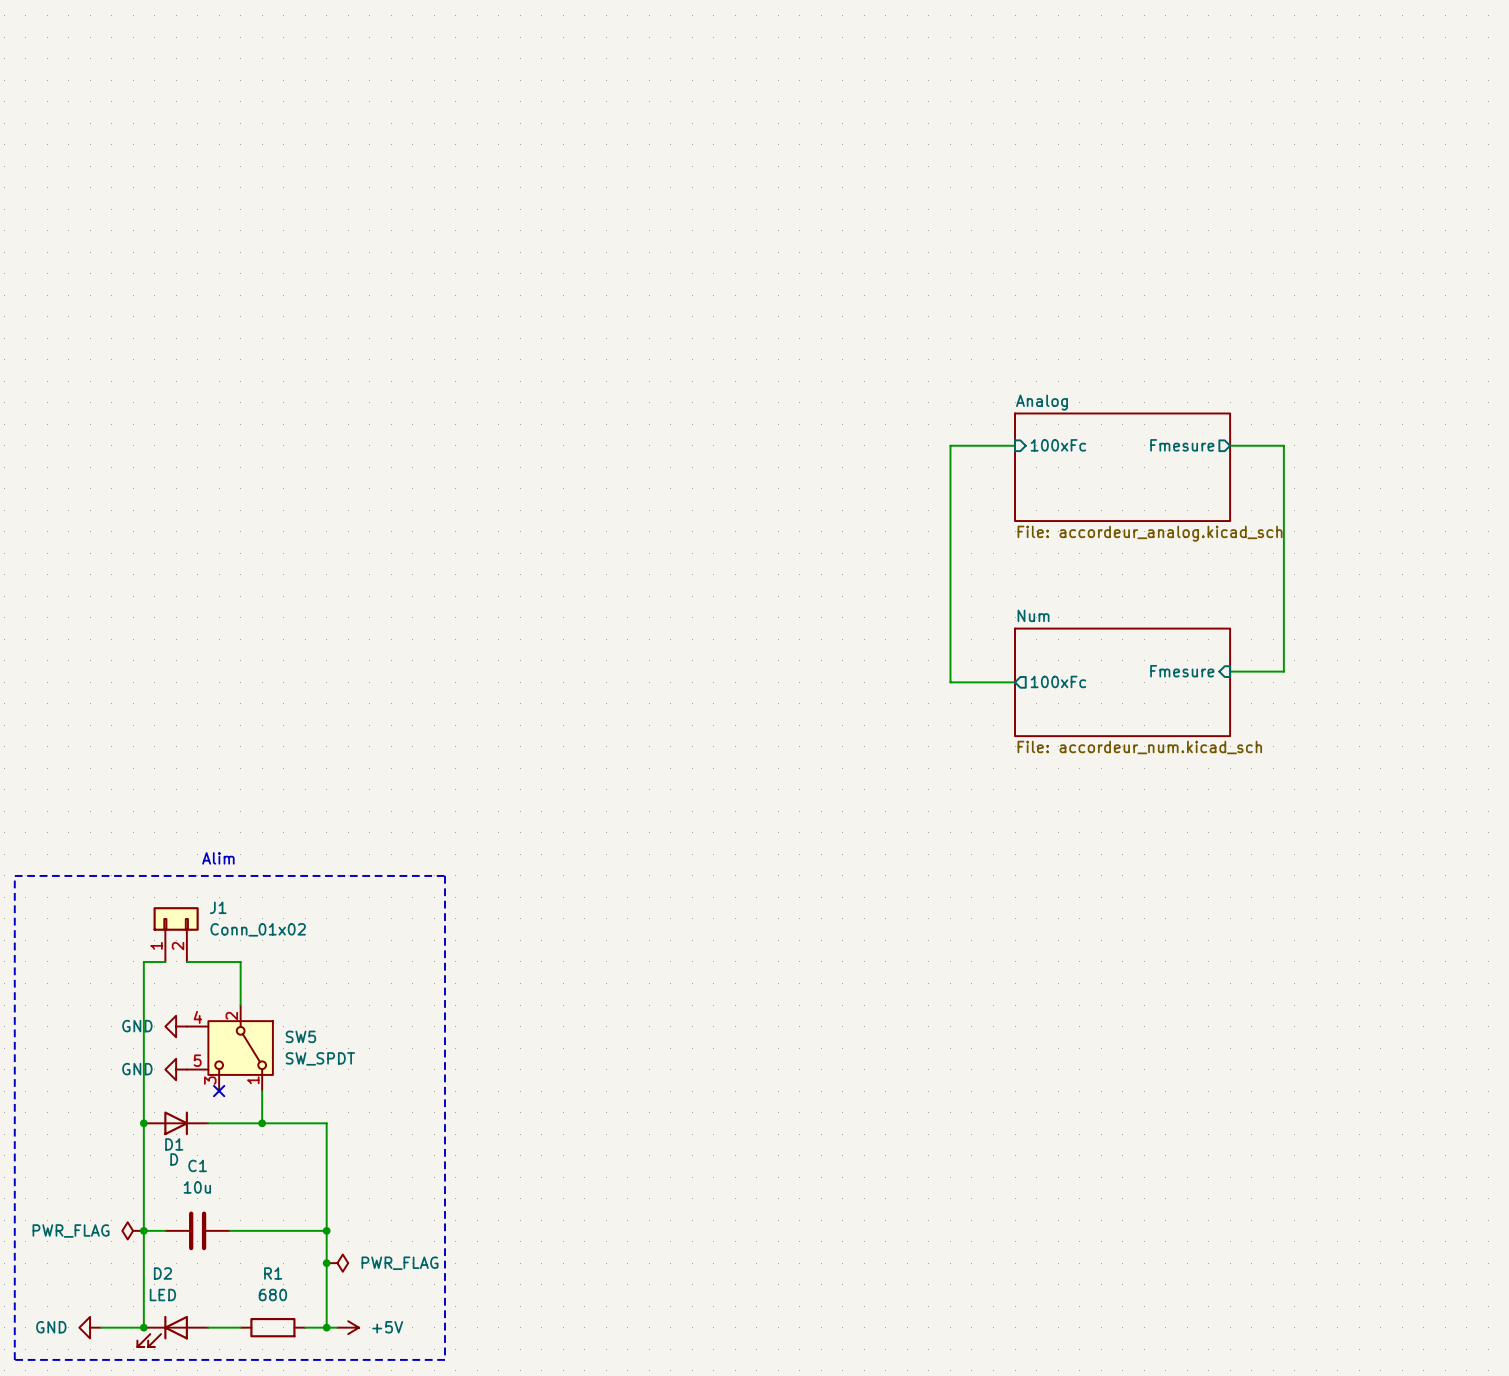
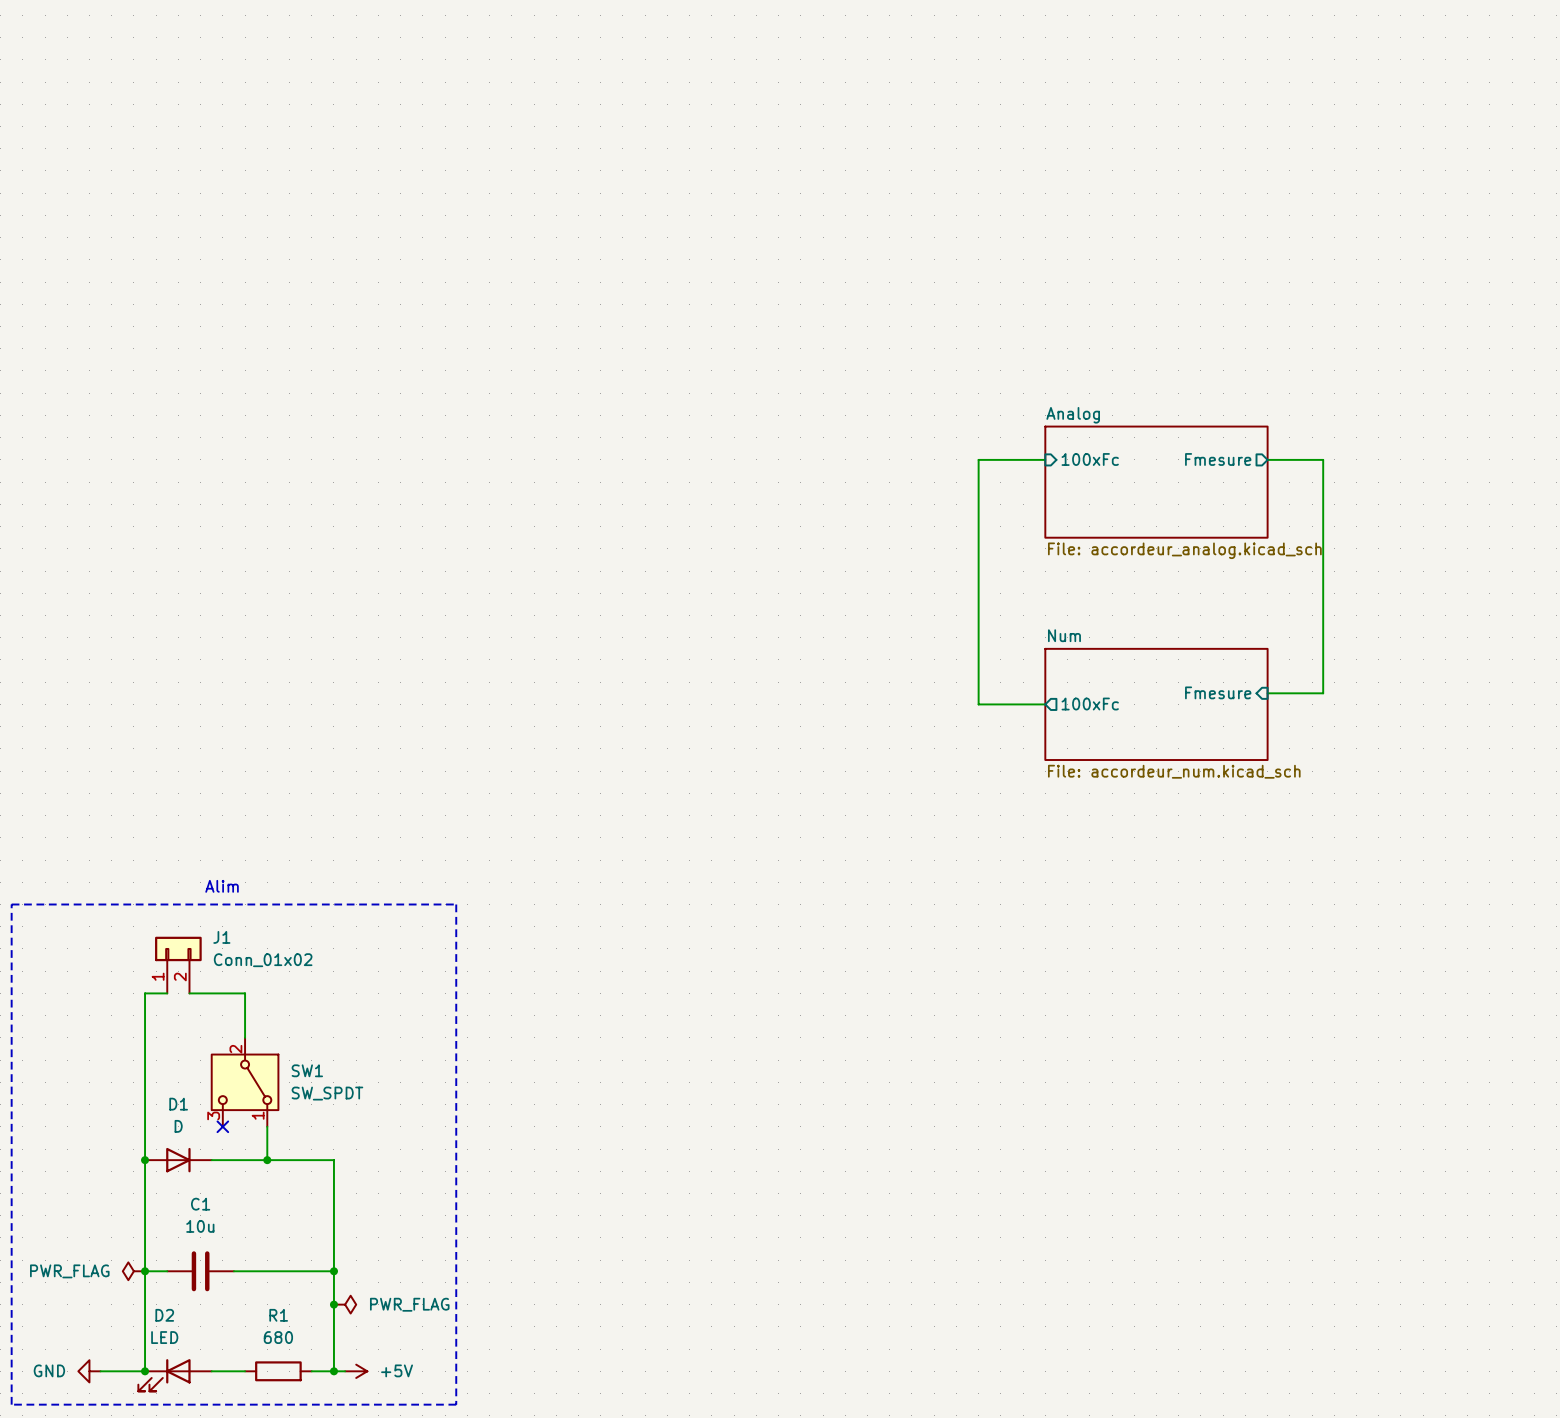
power symbol: GND (176, 1026) -> none
SW5: SW_SPDT (229, 1048) -> none
SW1: none -> SW_SPDT (245, 1082)
power symbol: GND (176, 1069) -> none
D1 name position: D1 (174, 1144) -> D1 (178, 1104)
D1 value position: D (174, 1159) -> D (178, 1126)

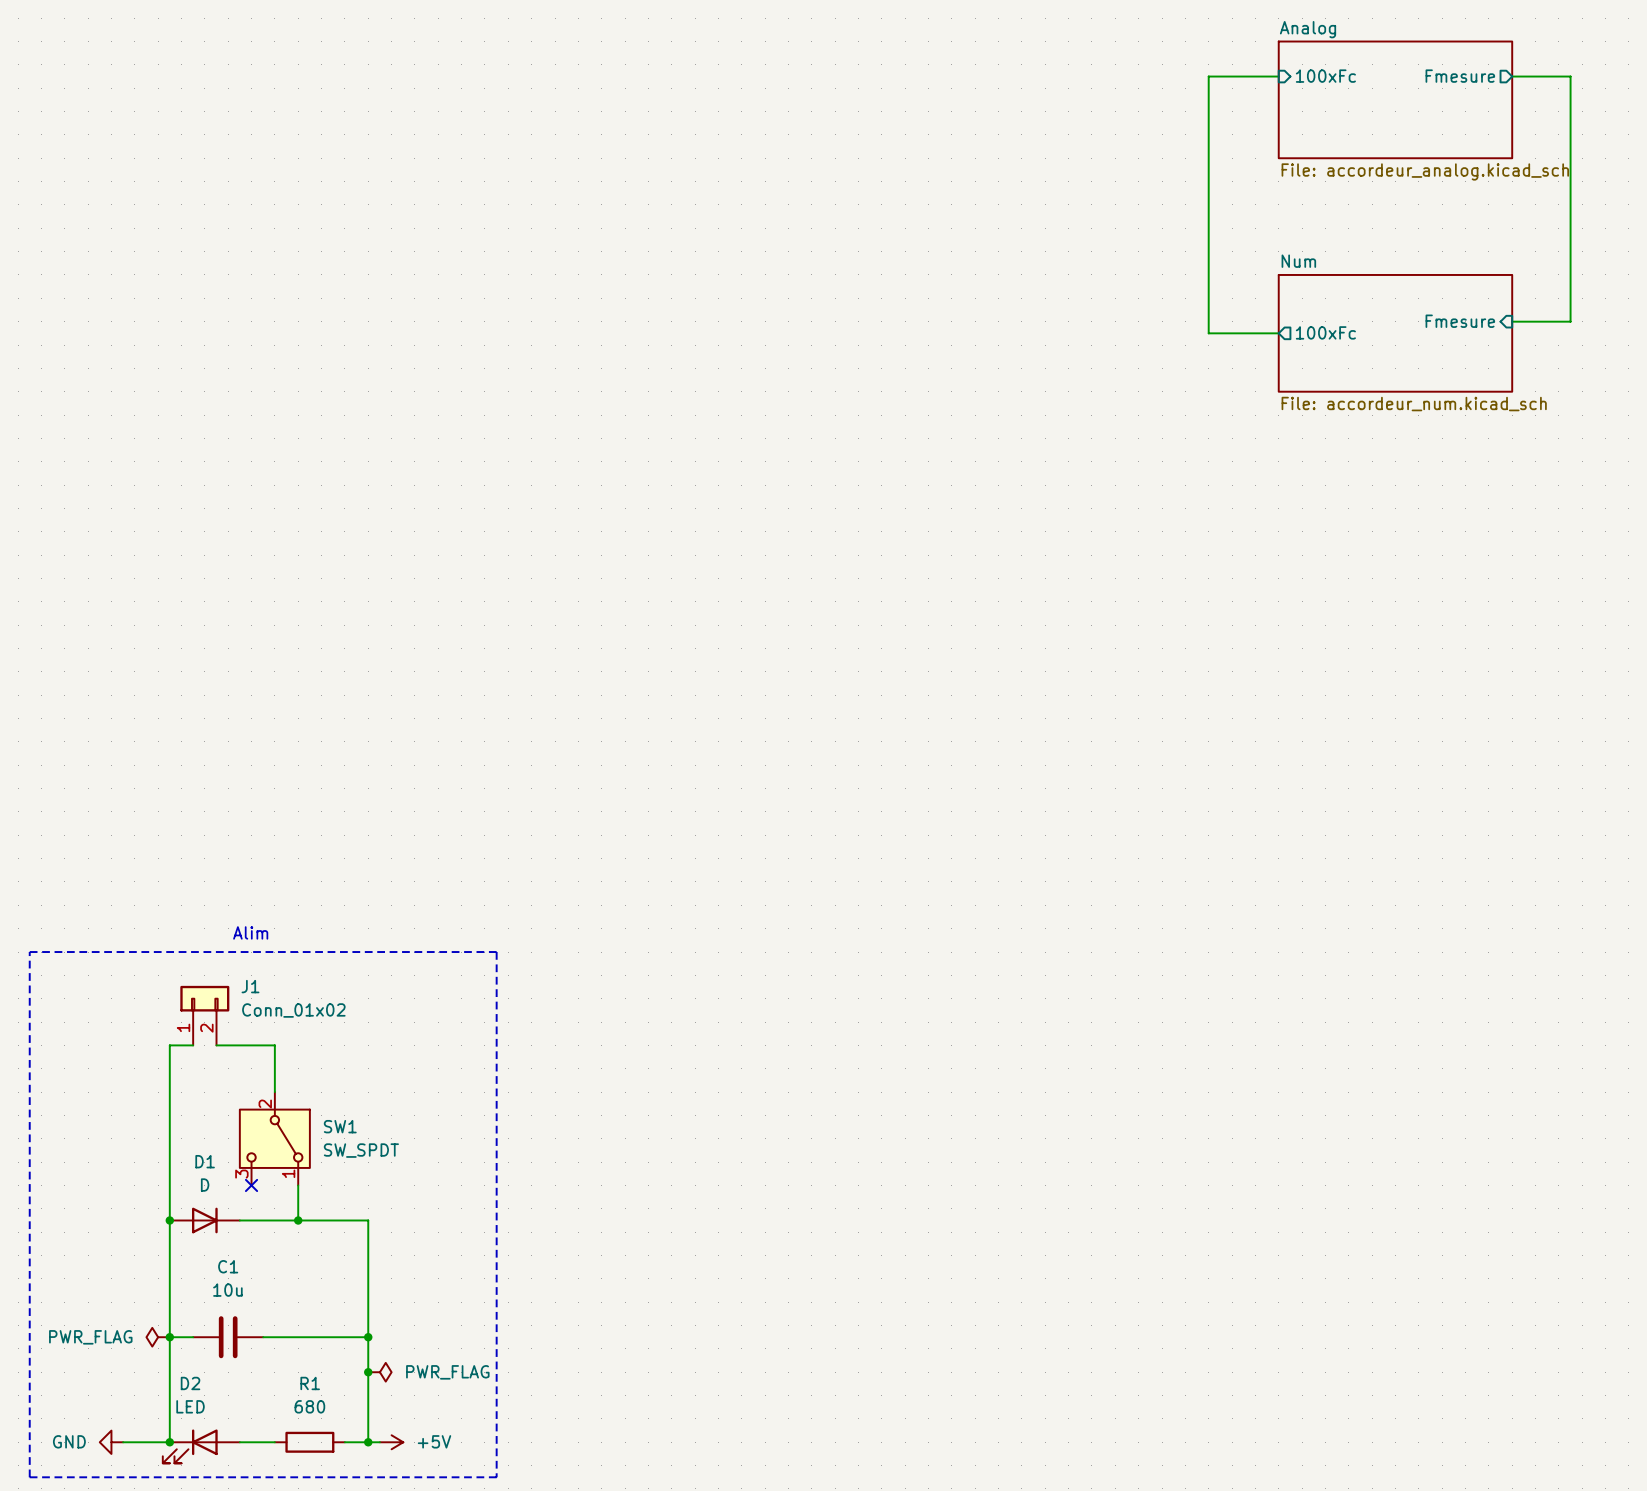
wire: none -> (1278, 76) (1208, 76) (1208, 333) (1278, 333)
sheet pin: none -> 100xFc (1325, 76)
sheet pin: none -> Fmesure (1460, 76)
wire: none -> (1512, 76) (1570, 76) (1570, 321) (1512, 321)
sheet Analog: none -> File: accordeur_analog.kicad_sch (1395, 99)
sheet pin: none -> Fmesure (1460, 321)
sheet pin: none -> 100xFc (1325, 332)
sheet Num: none -> File: accordeur_num.kicad_sch (1395, 333)
wire: (1045, 459) (978, 459) (978, 704) (1045, 704) -> none
sheet pin: 100xFc (1090, 459) -> none
sheet pin: Fmesure (1218, 459) -> none
wire: (1267, 459) (1323, 459) (1323, 693) (1267, 693) -> none
sheet Analog: File: accordeur_analog.kicad_sch (1156, 482) -> none
sheet pin: Fmesure (1218, 692) -> none
sheet pin: 100xFc (1090, 704) -> none
sheet Num: File: accordeur_num.kicad_sch (1156, 704) -> none

